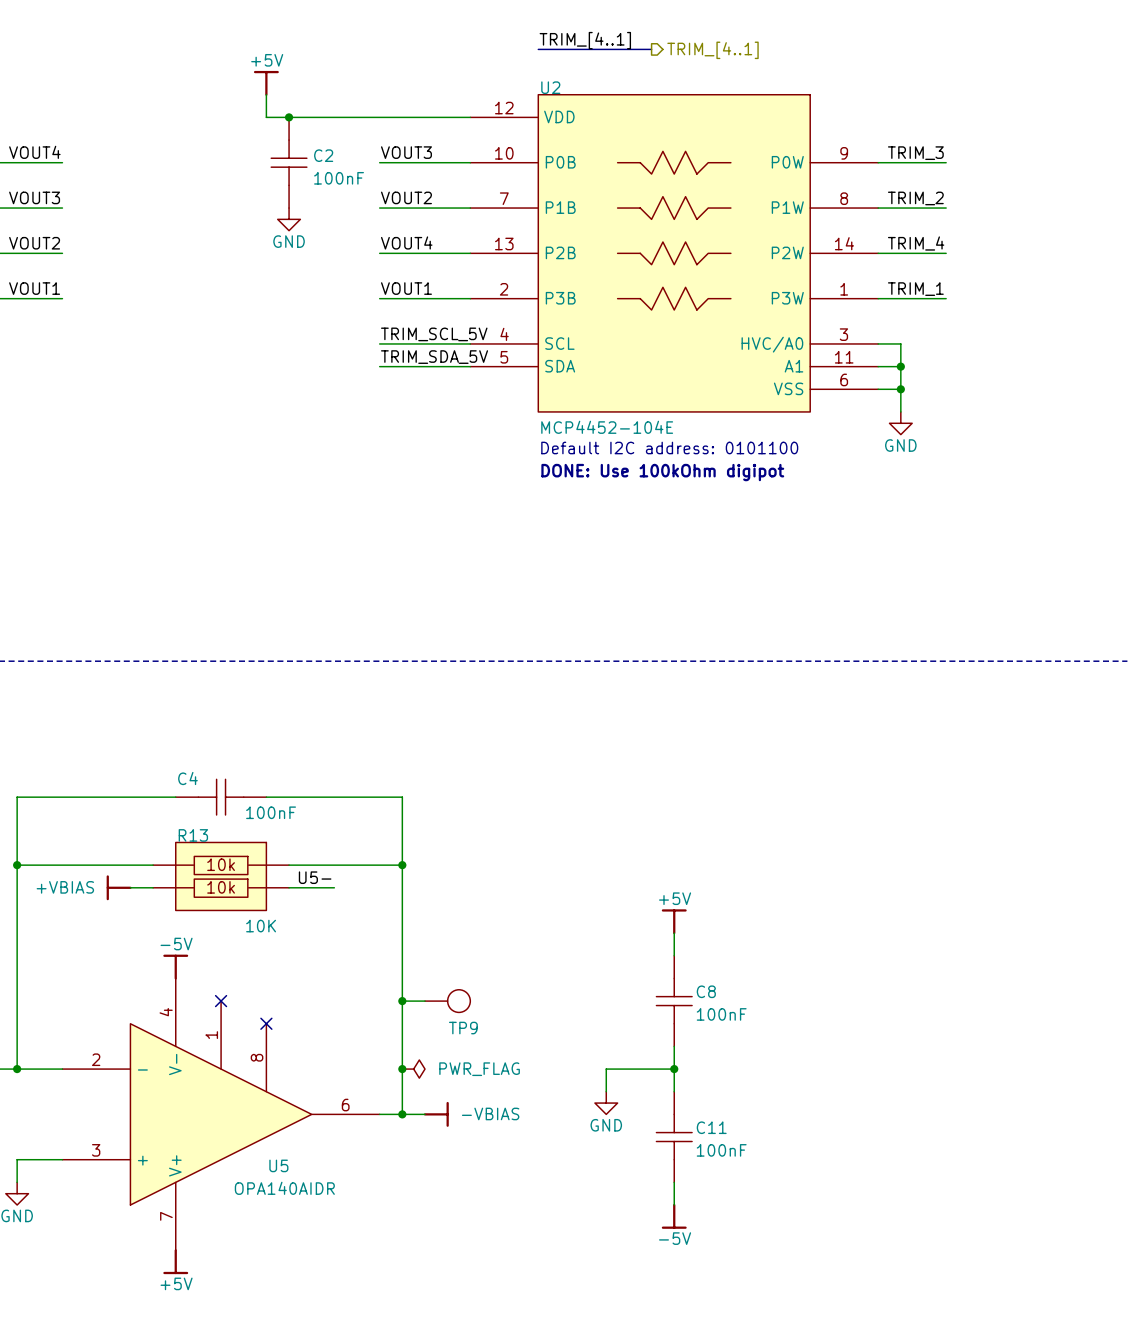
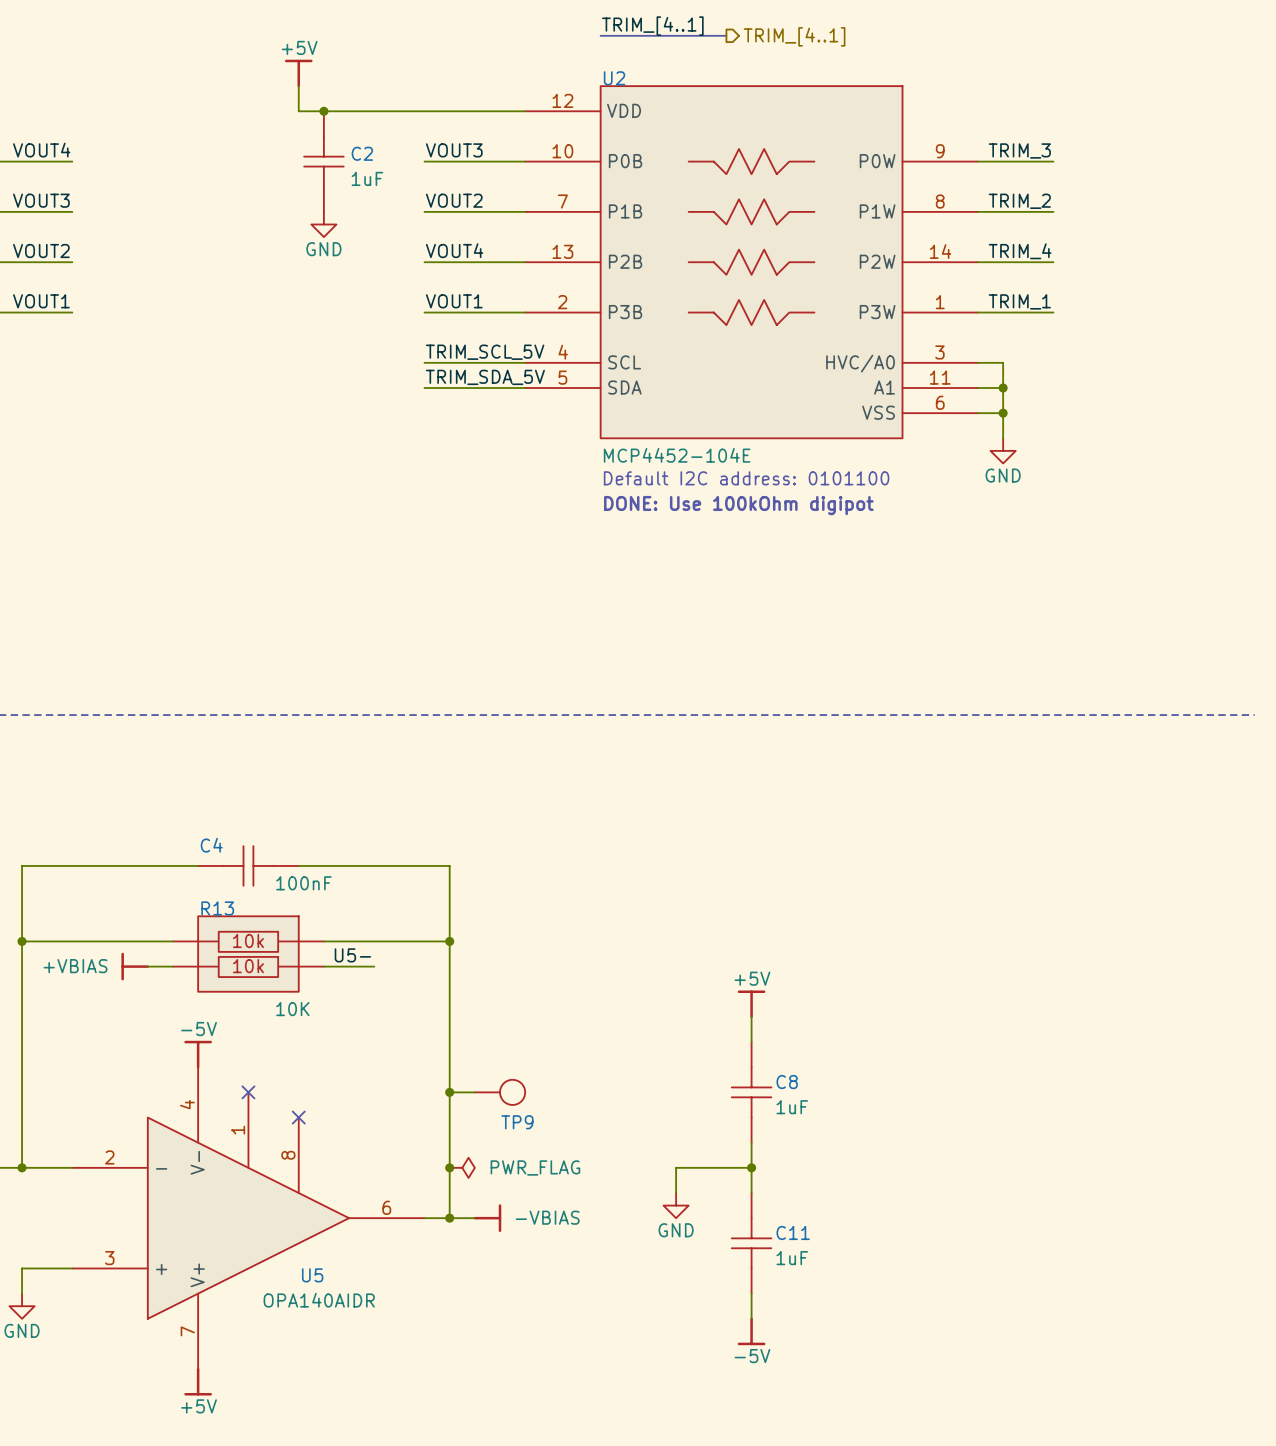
C2 value: 100nF (339, 178) -> 1uF (367, 178)
C8 value: 100nF (721, 1014) -> 1uF (792, 1107)
C11 value: 100nF (721, 1150) -> 1uF (792, 1258)

